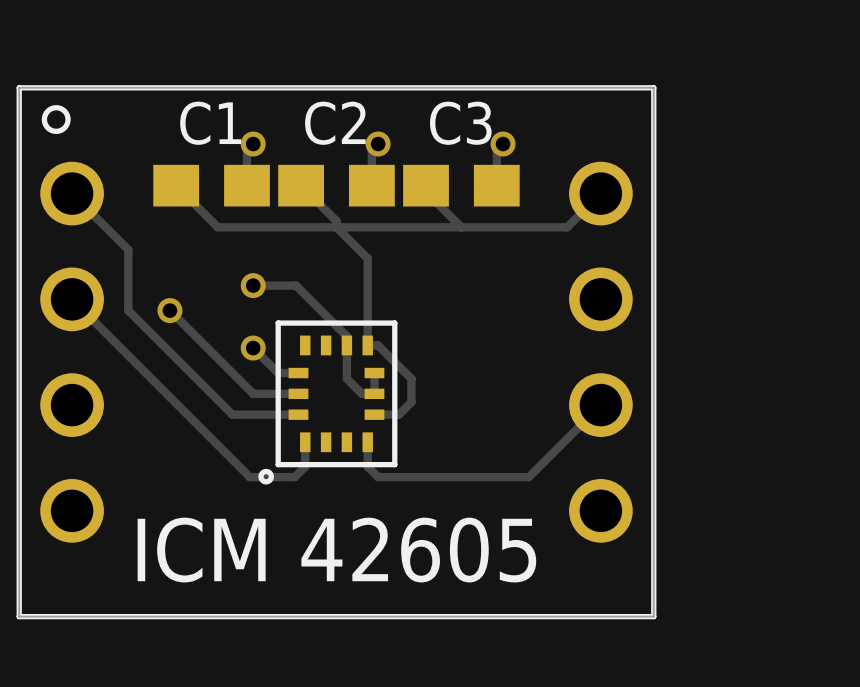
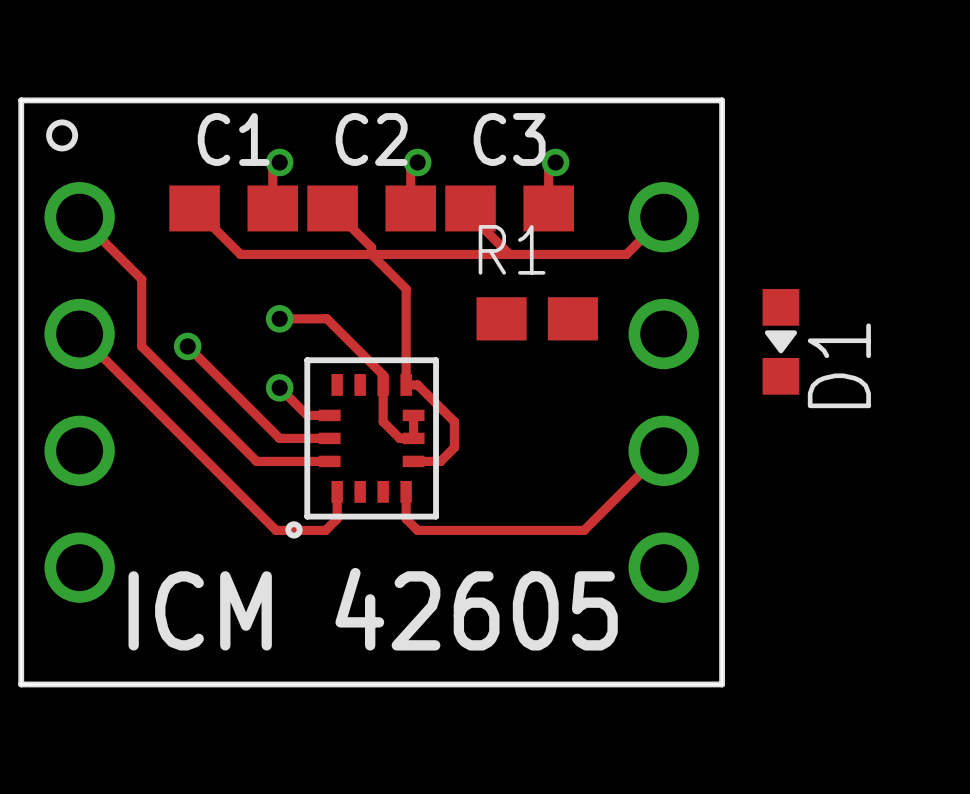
R1: none -> (537, 318)
D1: none -> (780, 341)

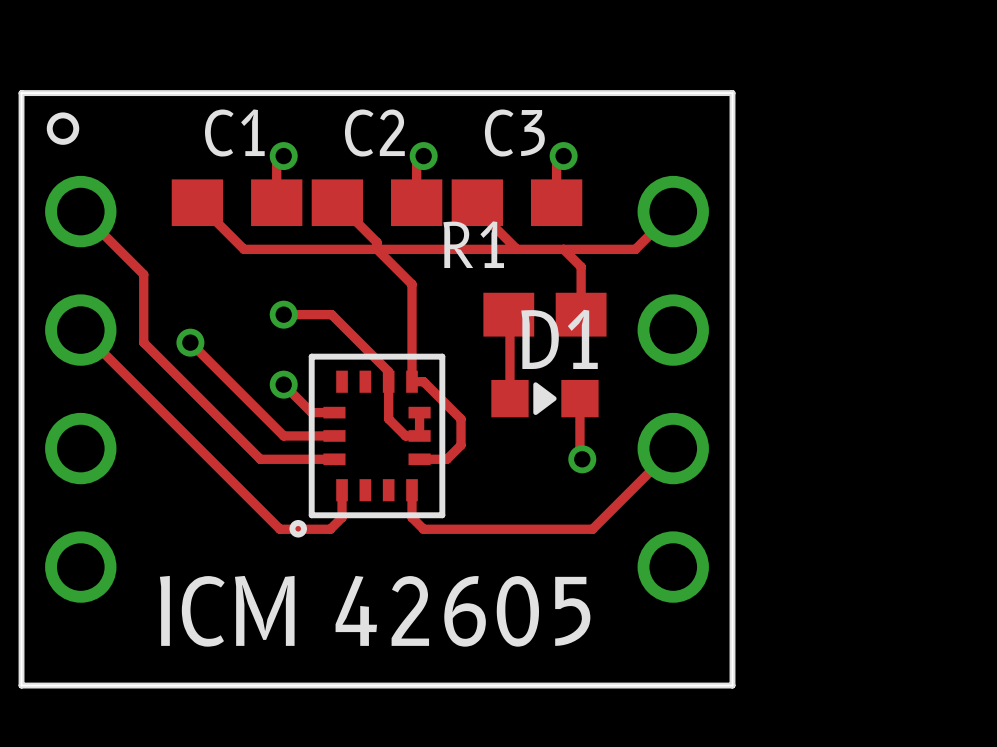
R1 name position: R1 (512, 249) -> R1 (473, 244)
track: none -> (563, 249) (581, 266) (581, 314)
track: none -> (508, 314) (509, 398)
D1 rotation: 0° (780, 341) -> 90° counterclockwise (544, 398)
D1 position: (780, 341) -> (544, 398)
track: none -> (579, 398) (579, 456) (582, 459)
via: none -> (582, 459)

